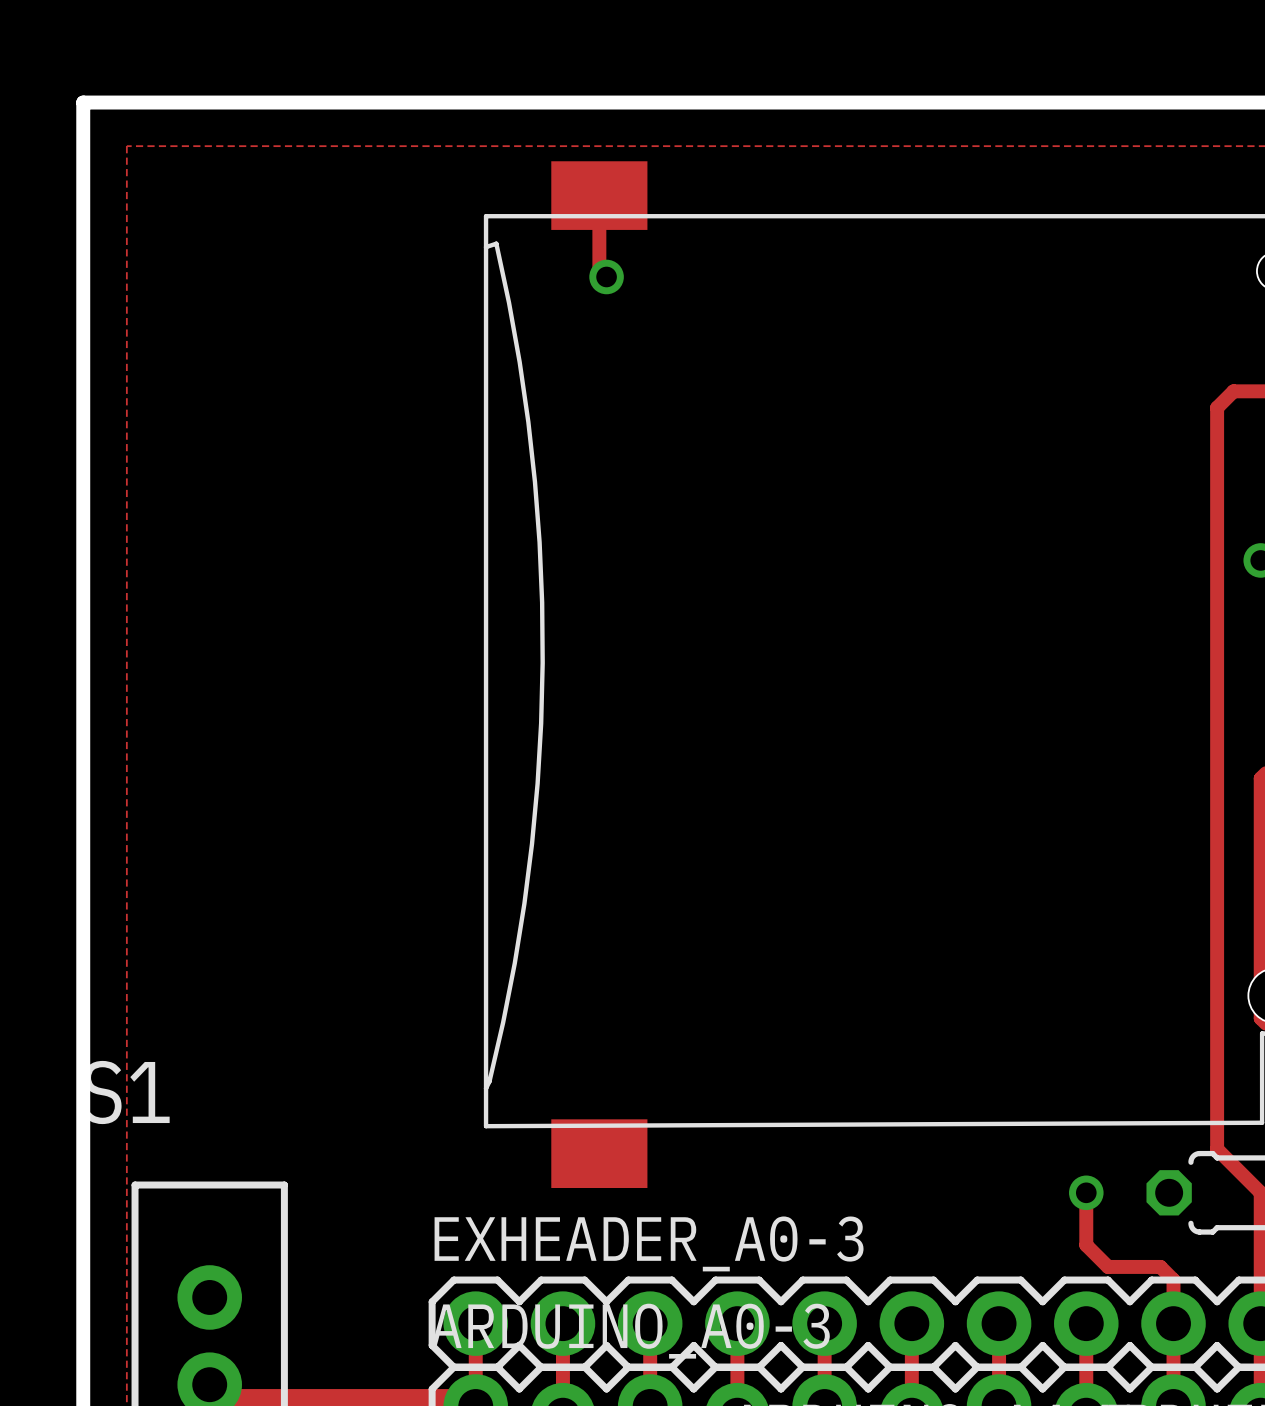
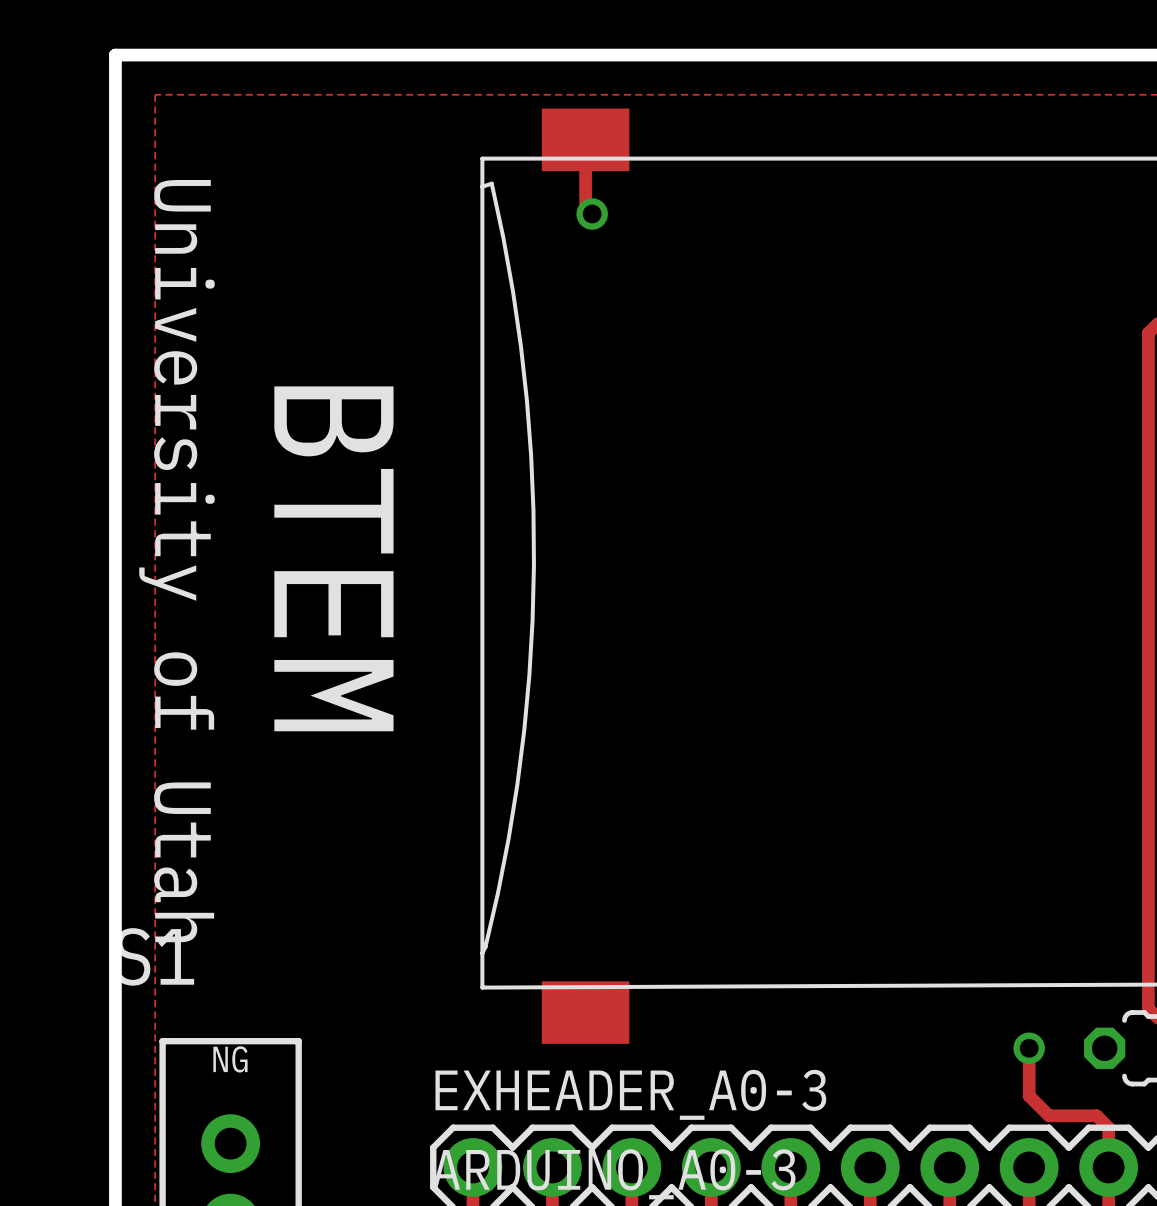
text: none -> BTEM (333, 558)
text: none -> University of Utah (176, 561)
text: none -> NG (230, 1059)

